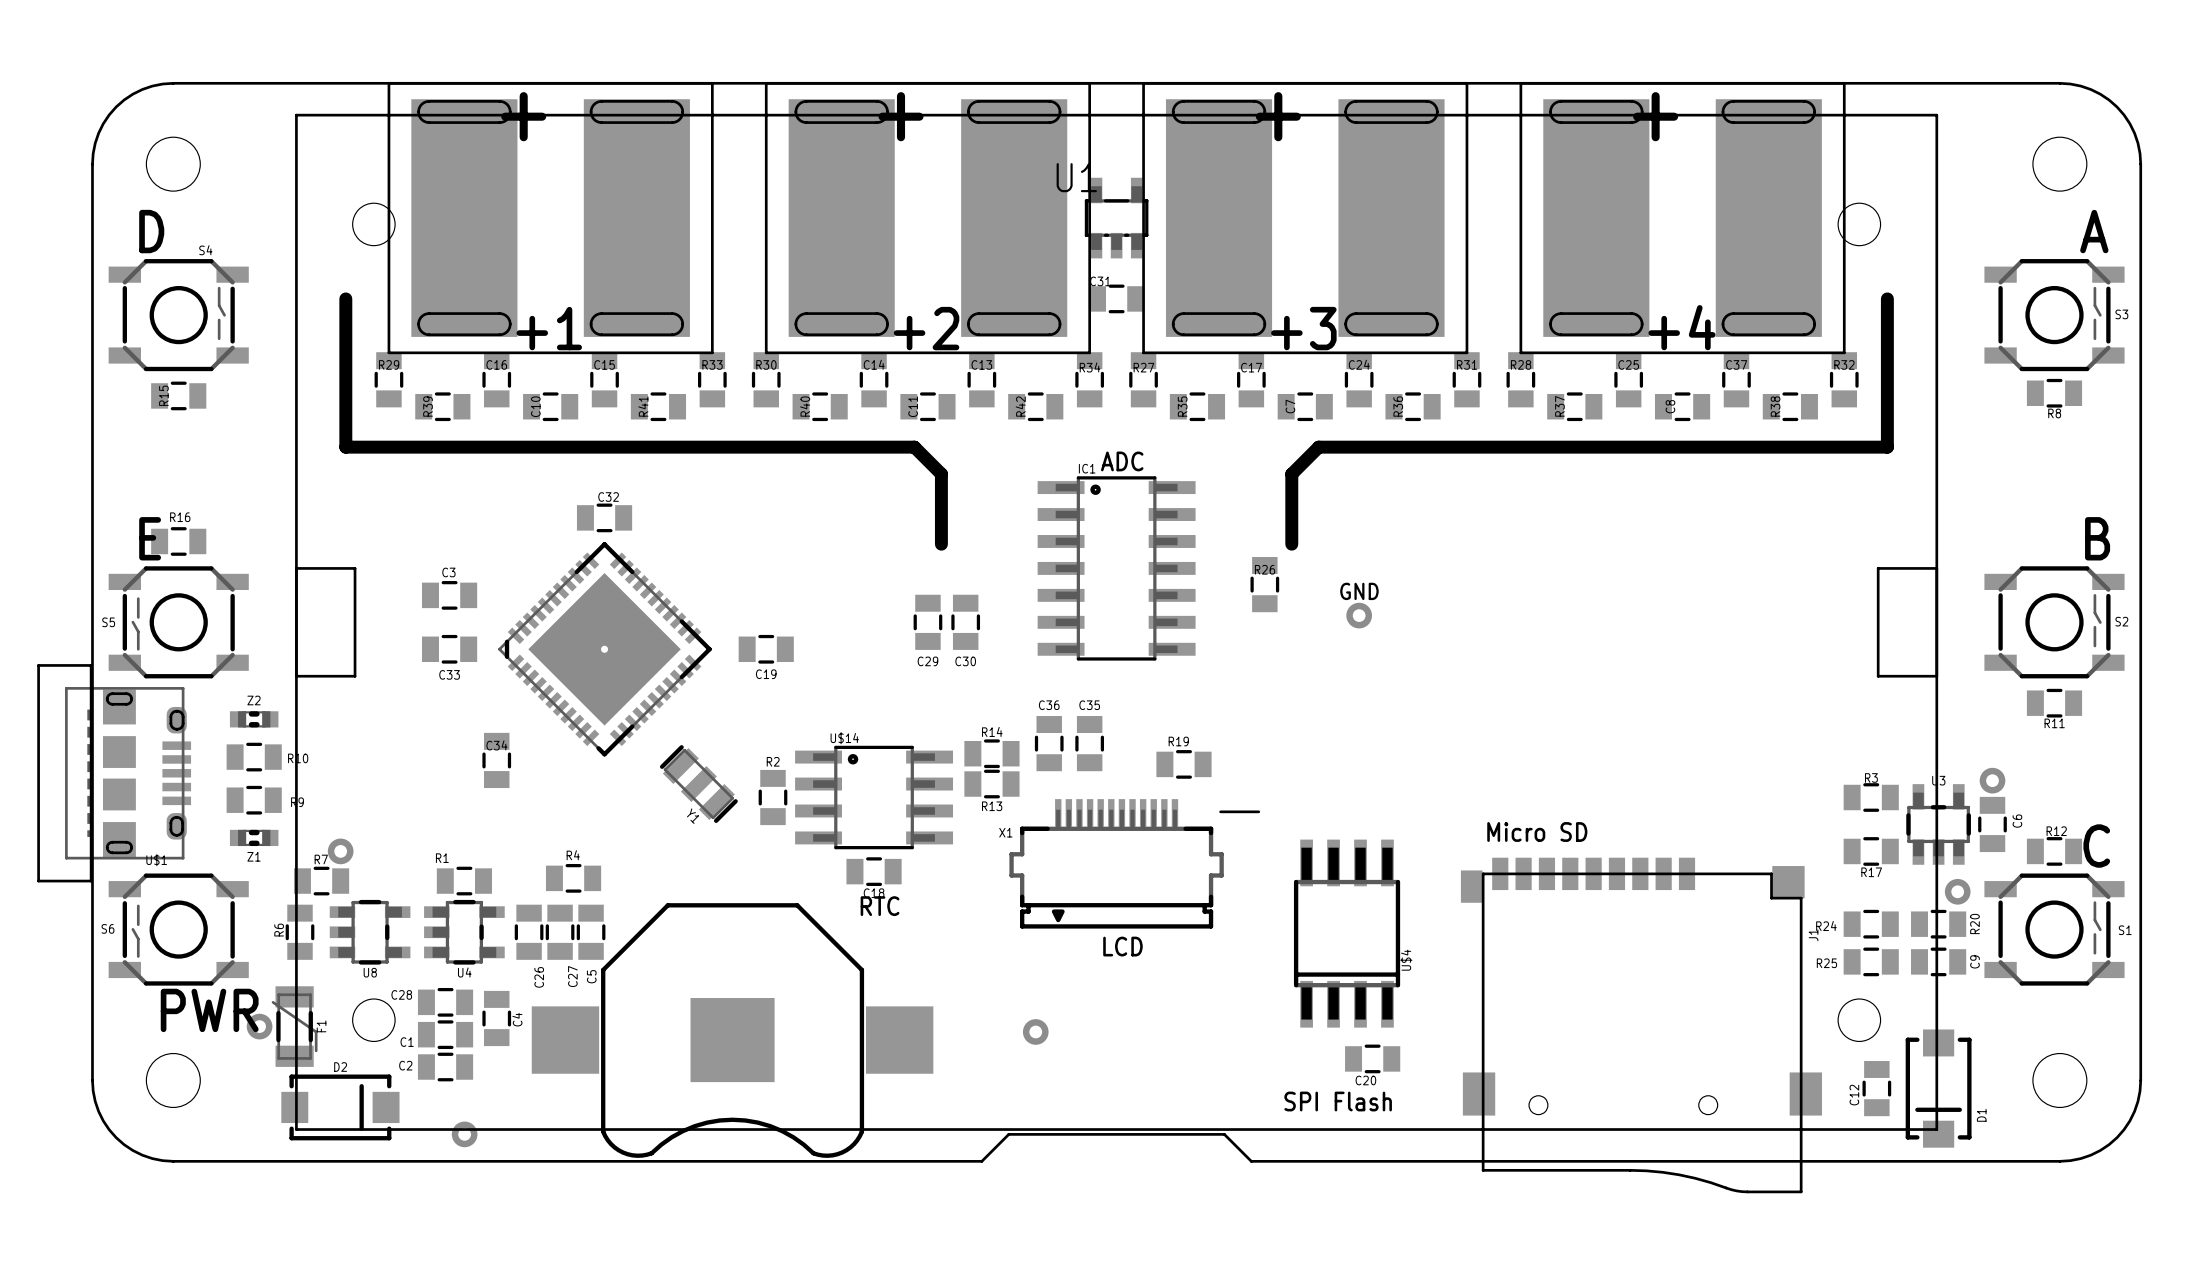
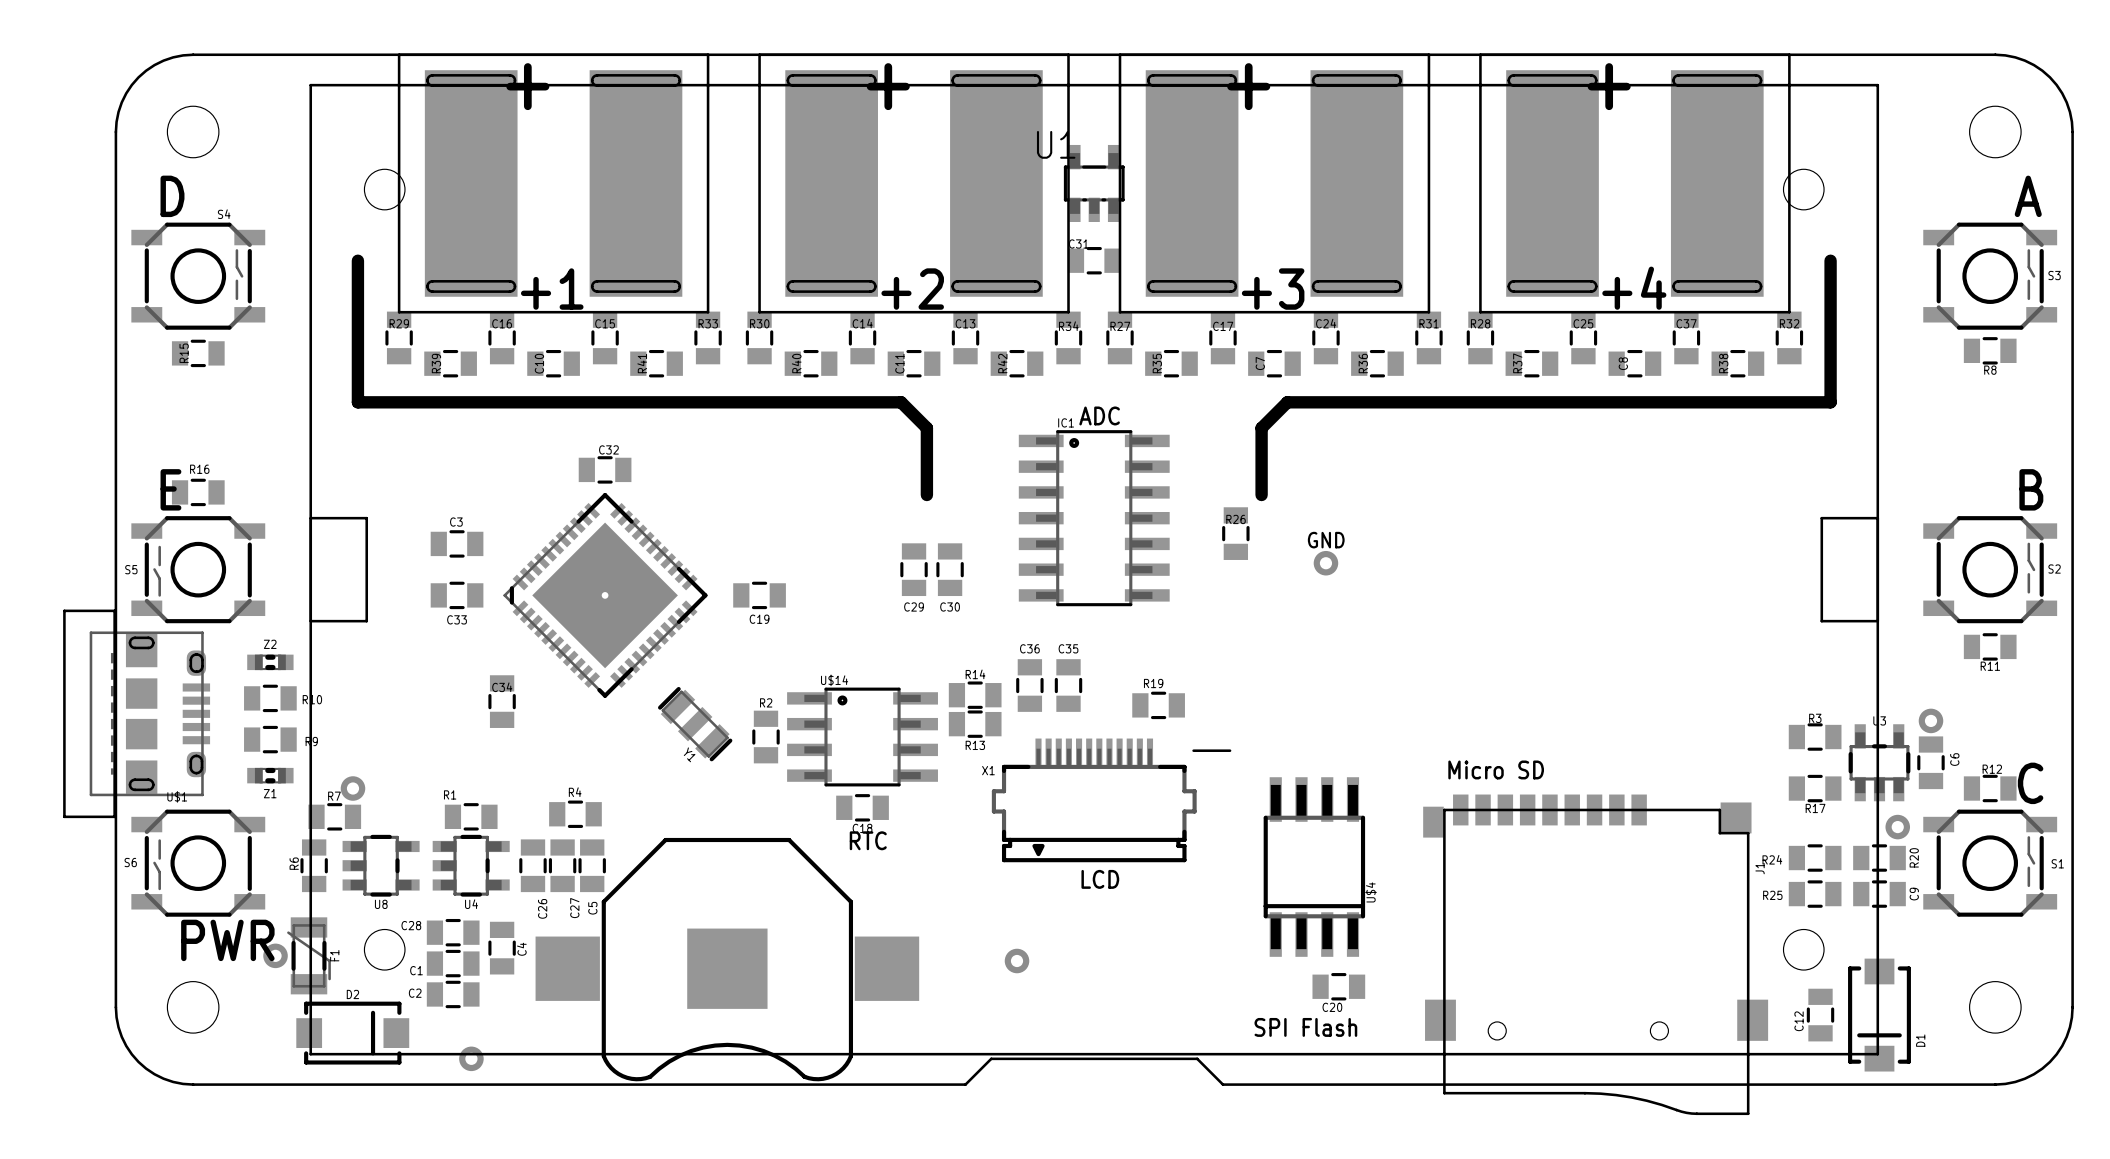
part footprint: [387, 81, 714, 355] -> [397, 53, 710, 314]
part footprint: [764, 81, 1092, 355] -> [758, 53, 1070, 314]
part footprint: [1142, 81, 1469, 355] -> [1118, 53, 1431, 314]
part footprint: [1519, 81, 1846, 355] -> [1479, 53, 1791, 314]

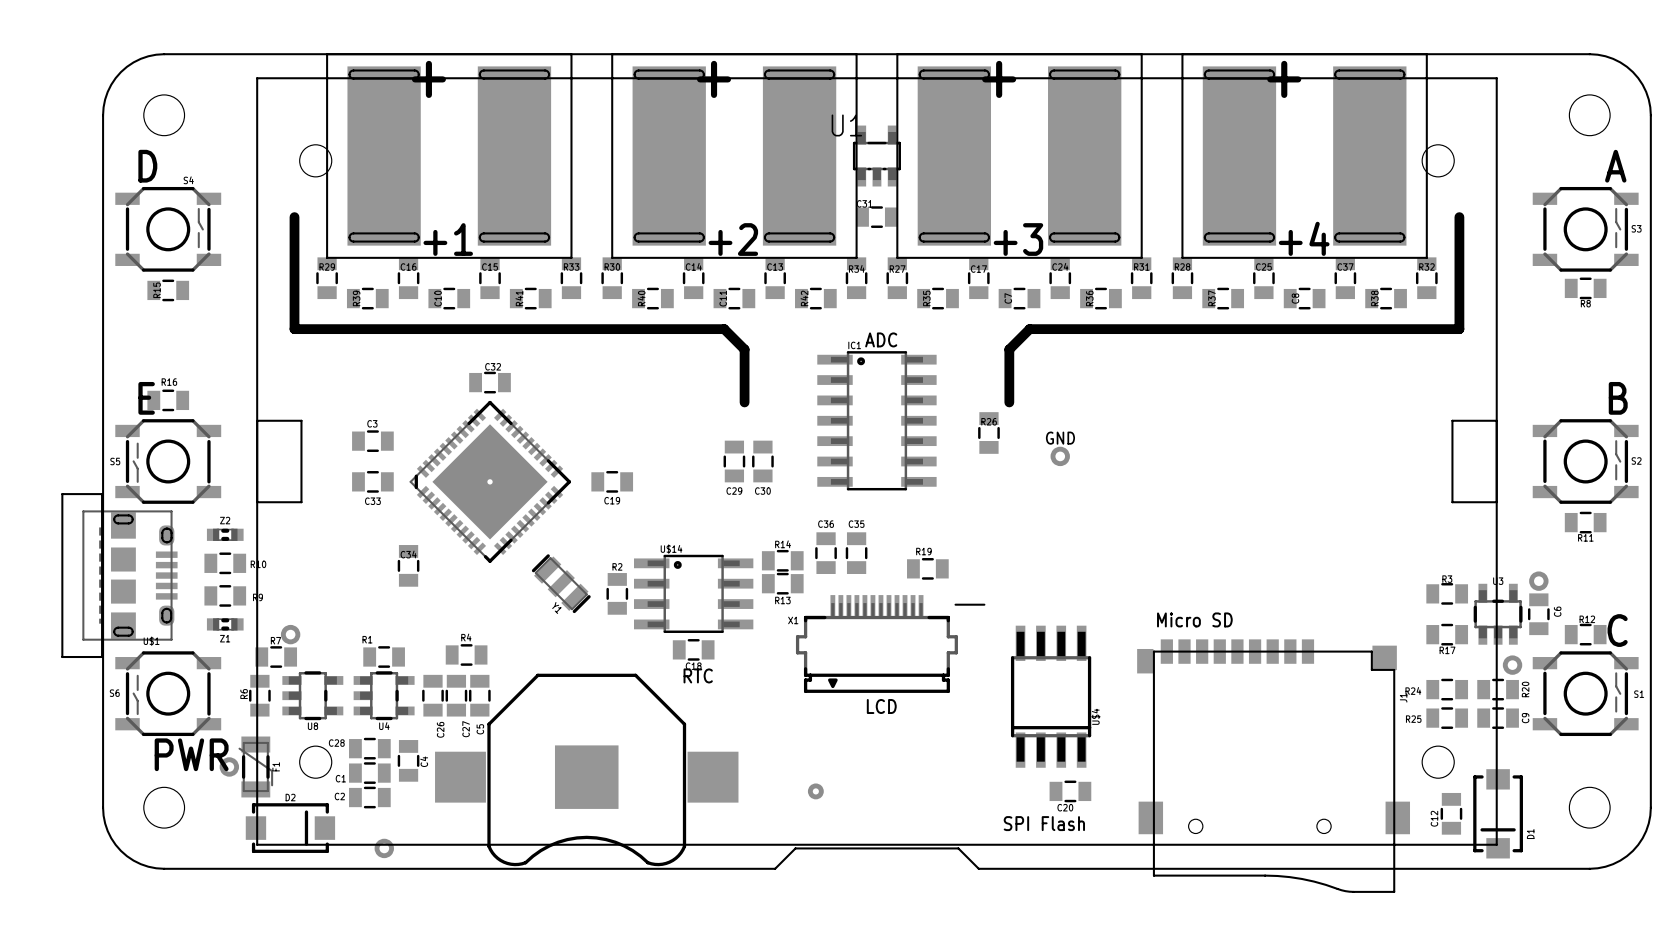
part: (1017, 961) -> none
part: none -> (815, 791)

